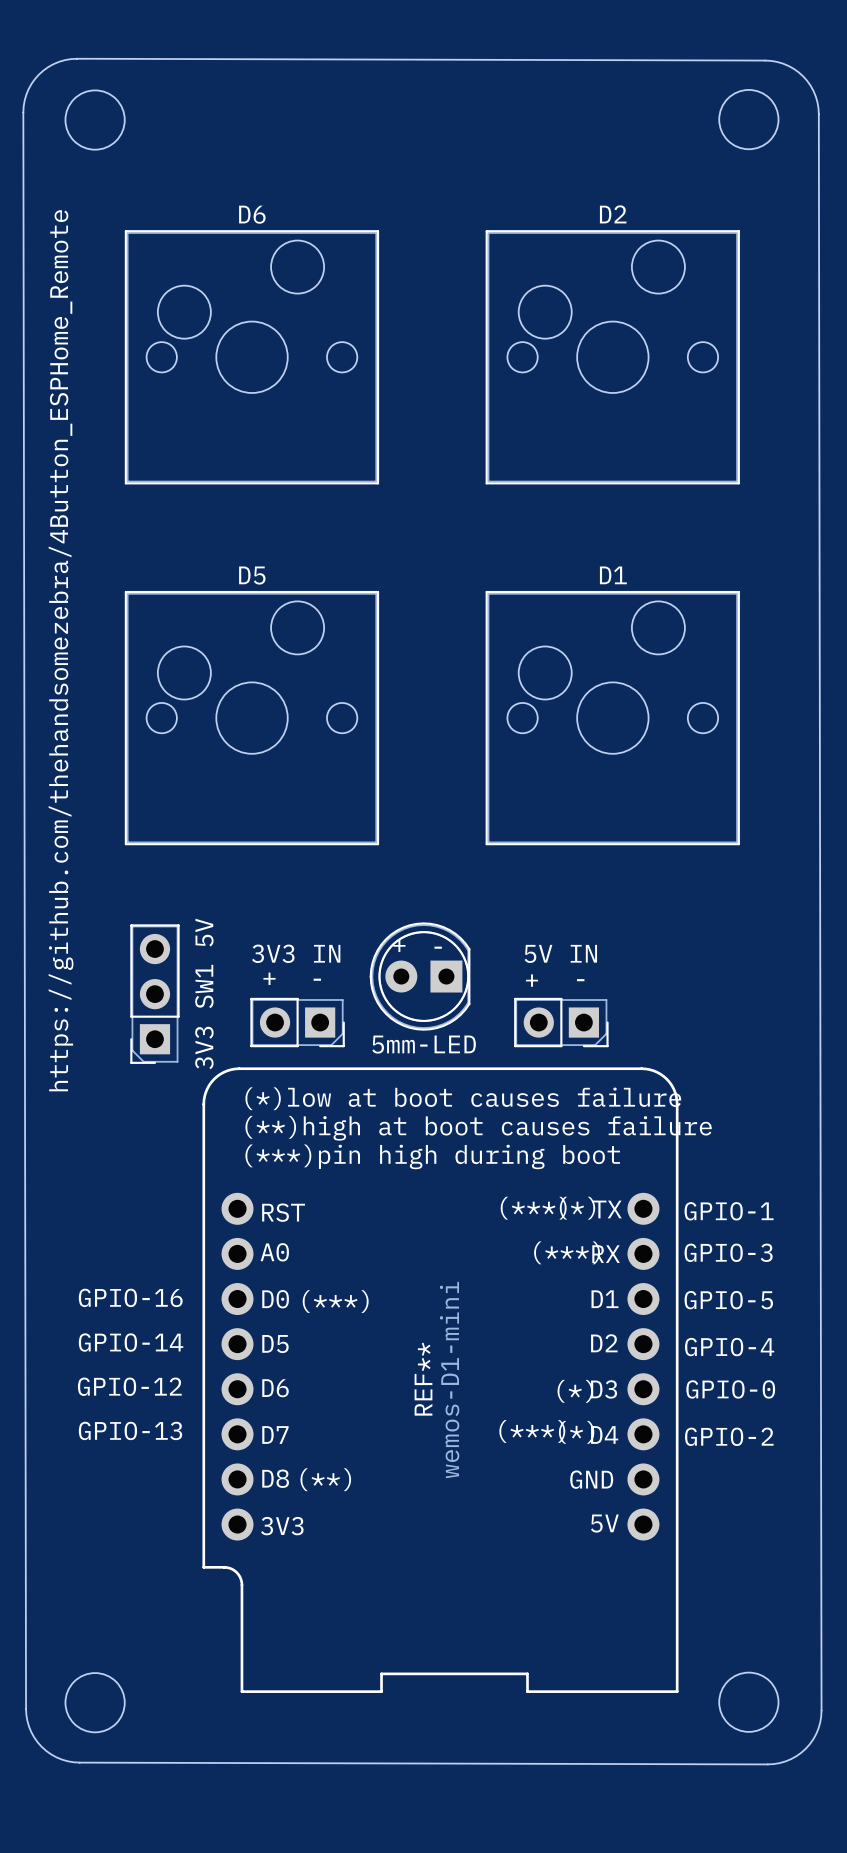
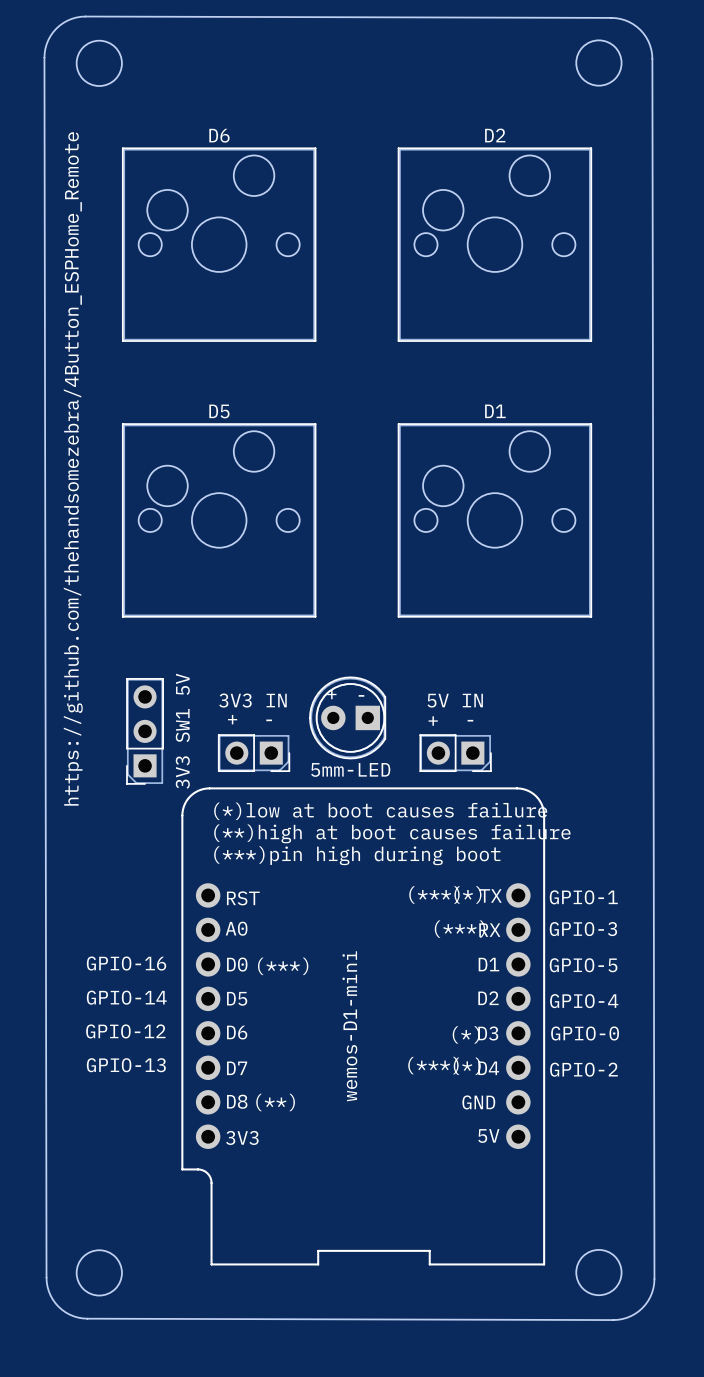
REF** name: REF** (423, 1379) -> wemos-D1-mini (349, 1026)
REF** value: wemos-D1-mini (449, 1380) -> none

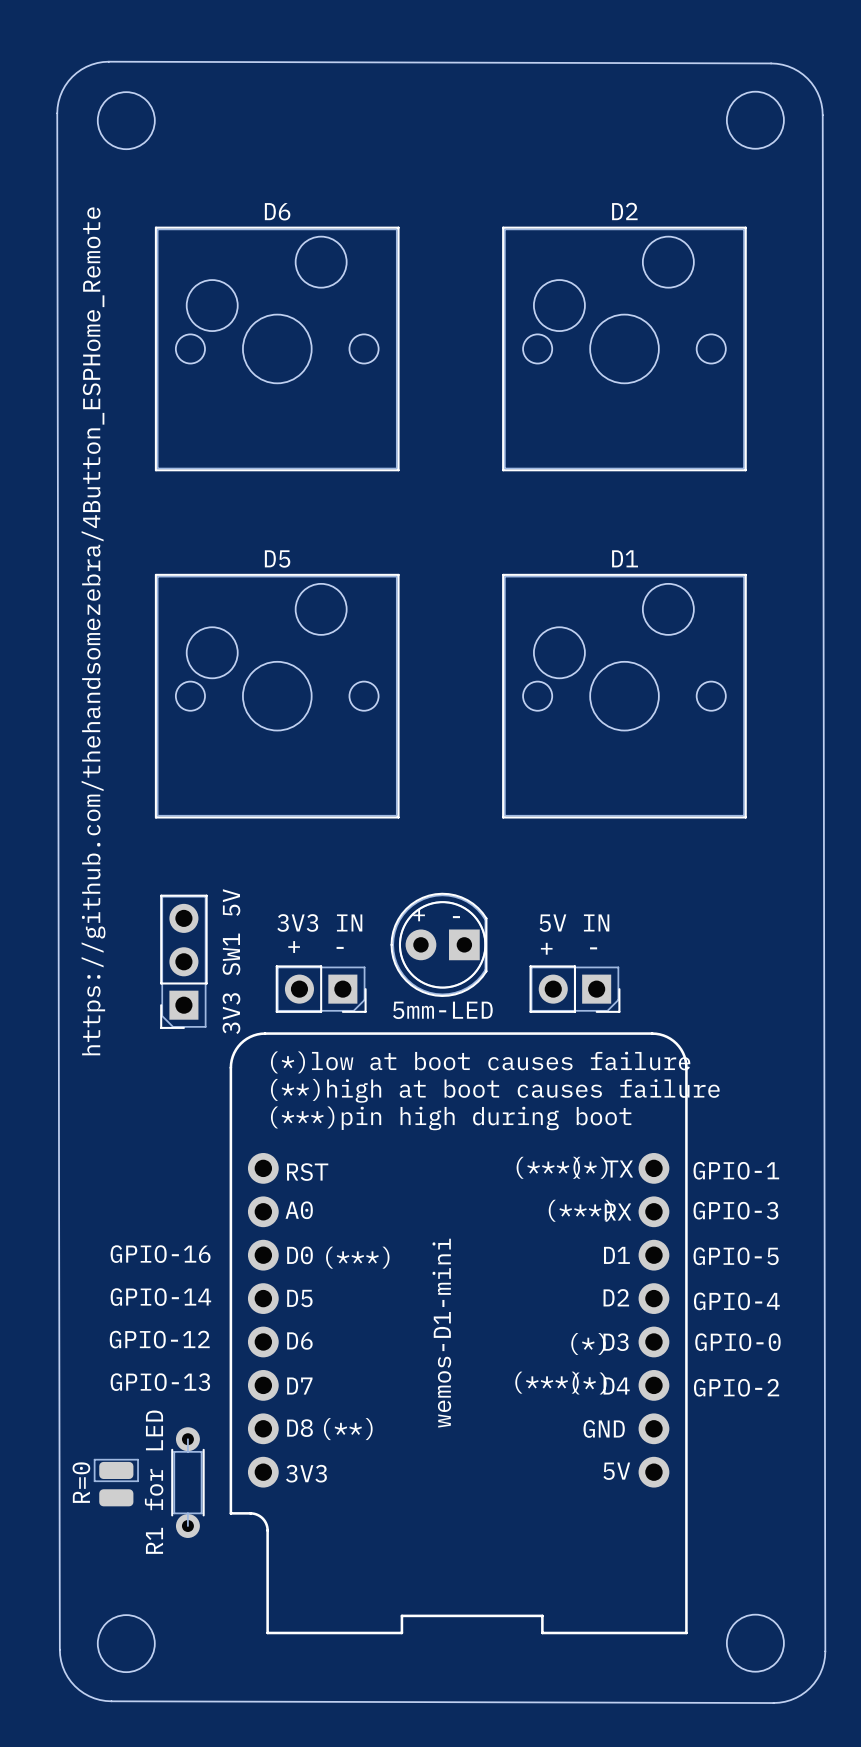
R=0: none -> (116, 1470)
R1 for LED: none -> (187, 1482)
part: none -> (116, 1497)

